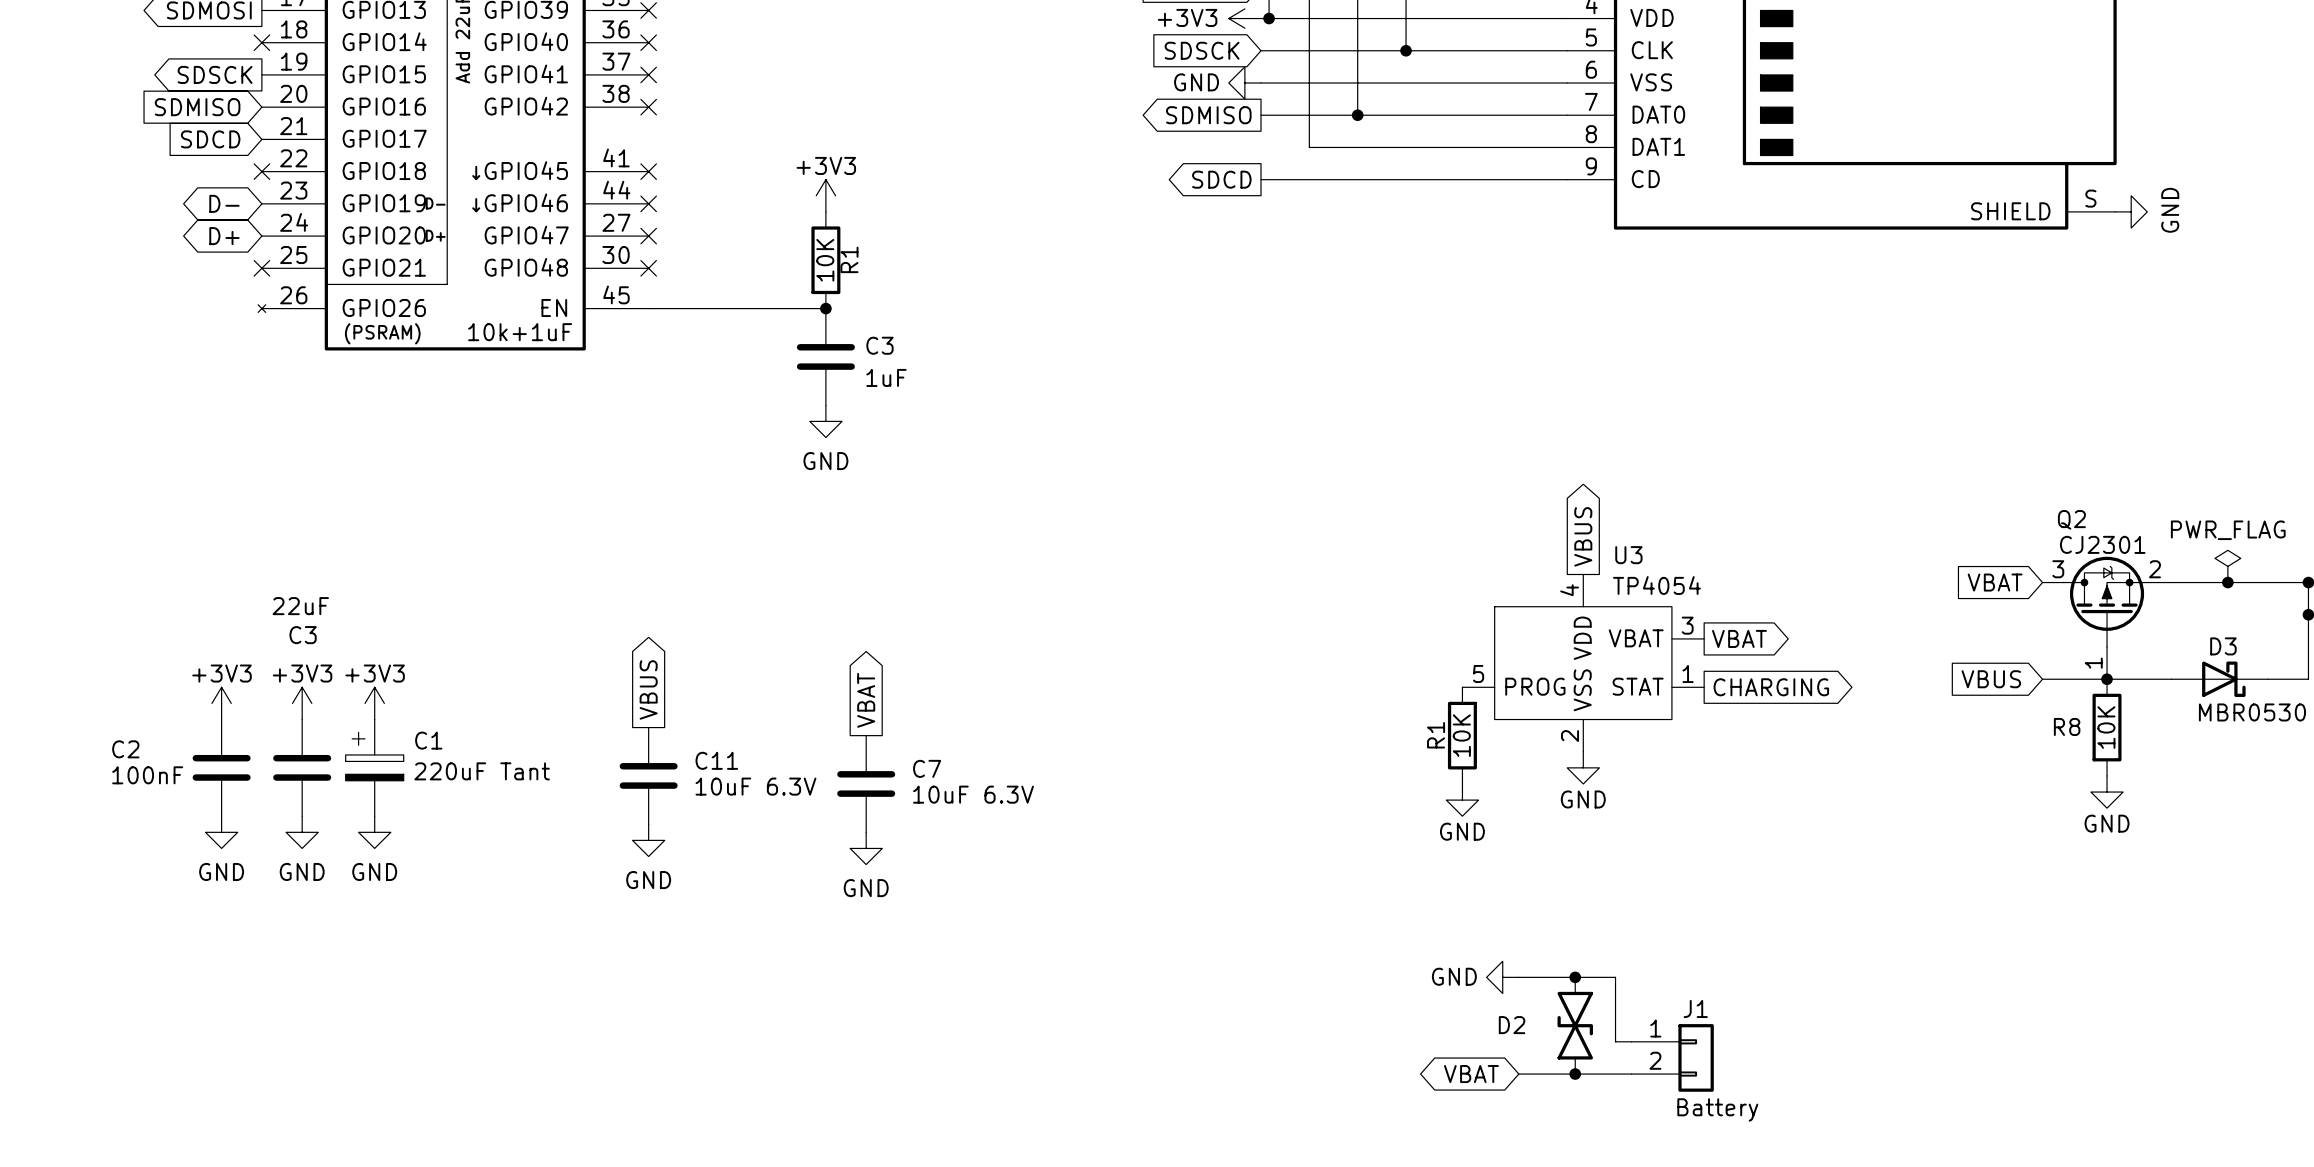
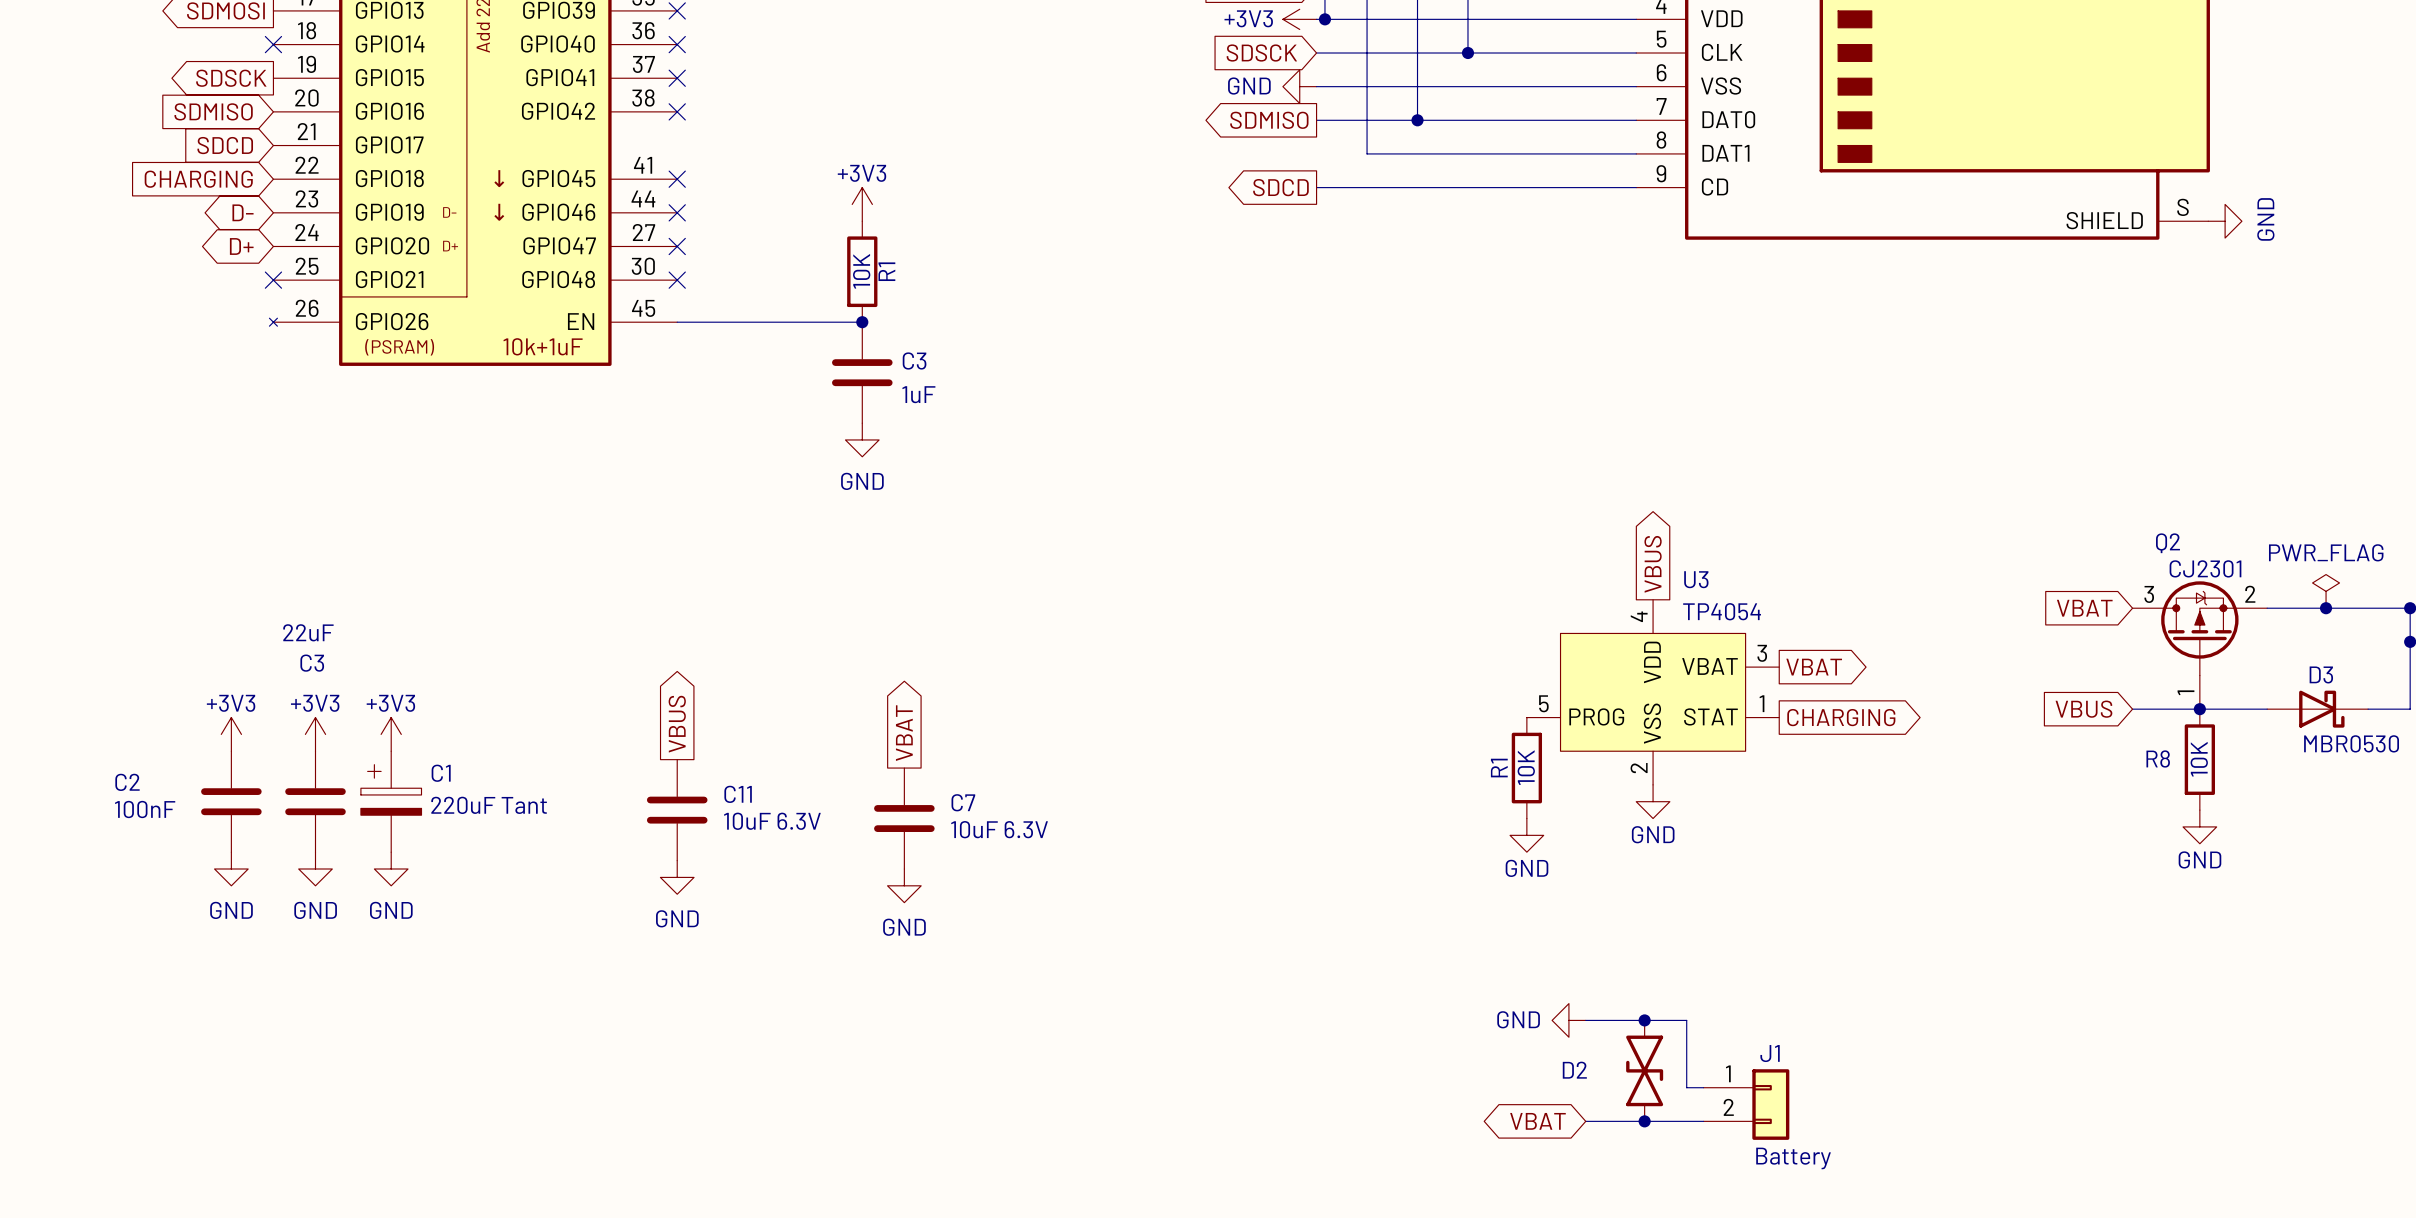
global label: none -> CHARGING (198, 179)
no-connect mark: (261, 171) -> none

